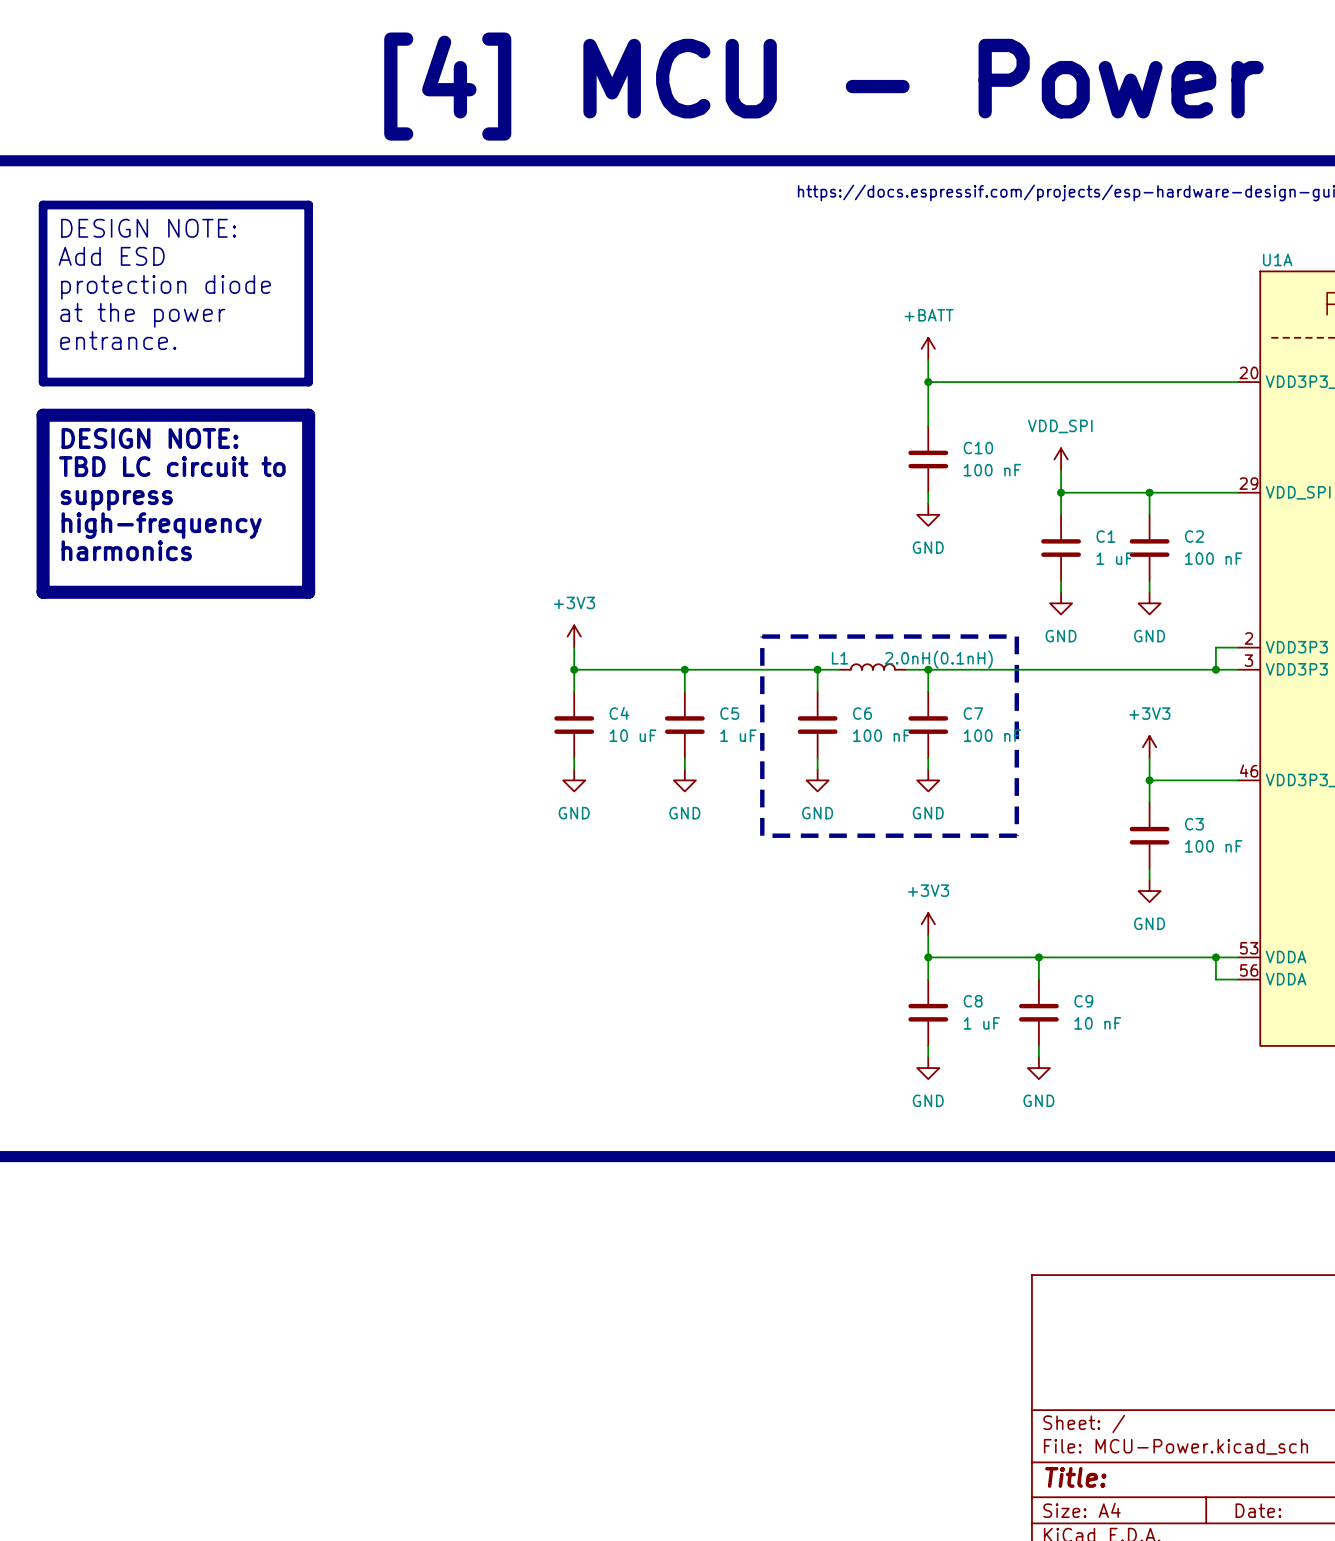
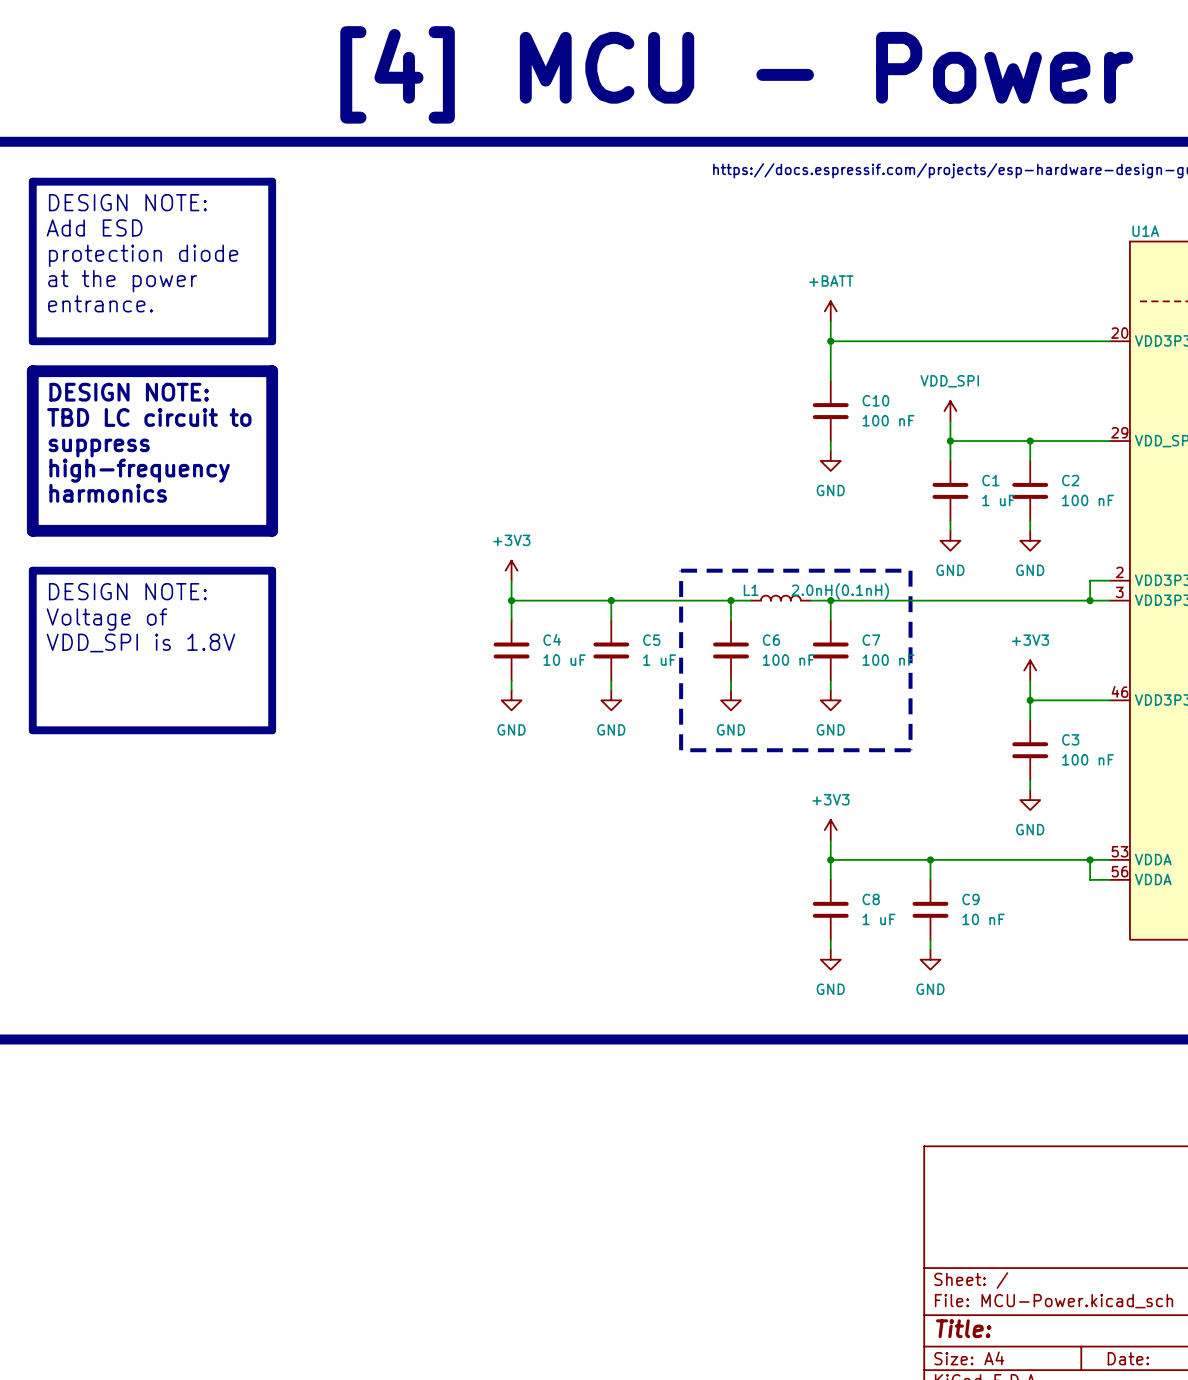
line: none -> (32, 570) (272, 570) (272, 730) (32, 730) (32, 570)
text: none -> DESIGN NOTE: (127, 591)
text: none -> Voltage of (106, 619)
text: none -> VDD_SPI is 1.8V (140, 643)

